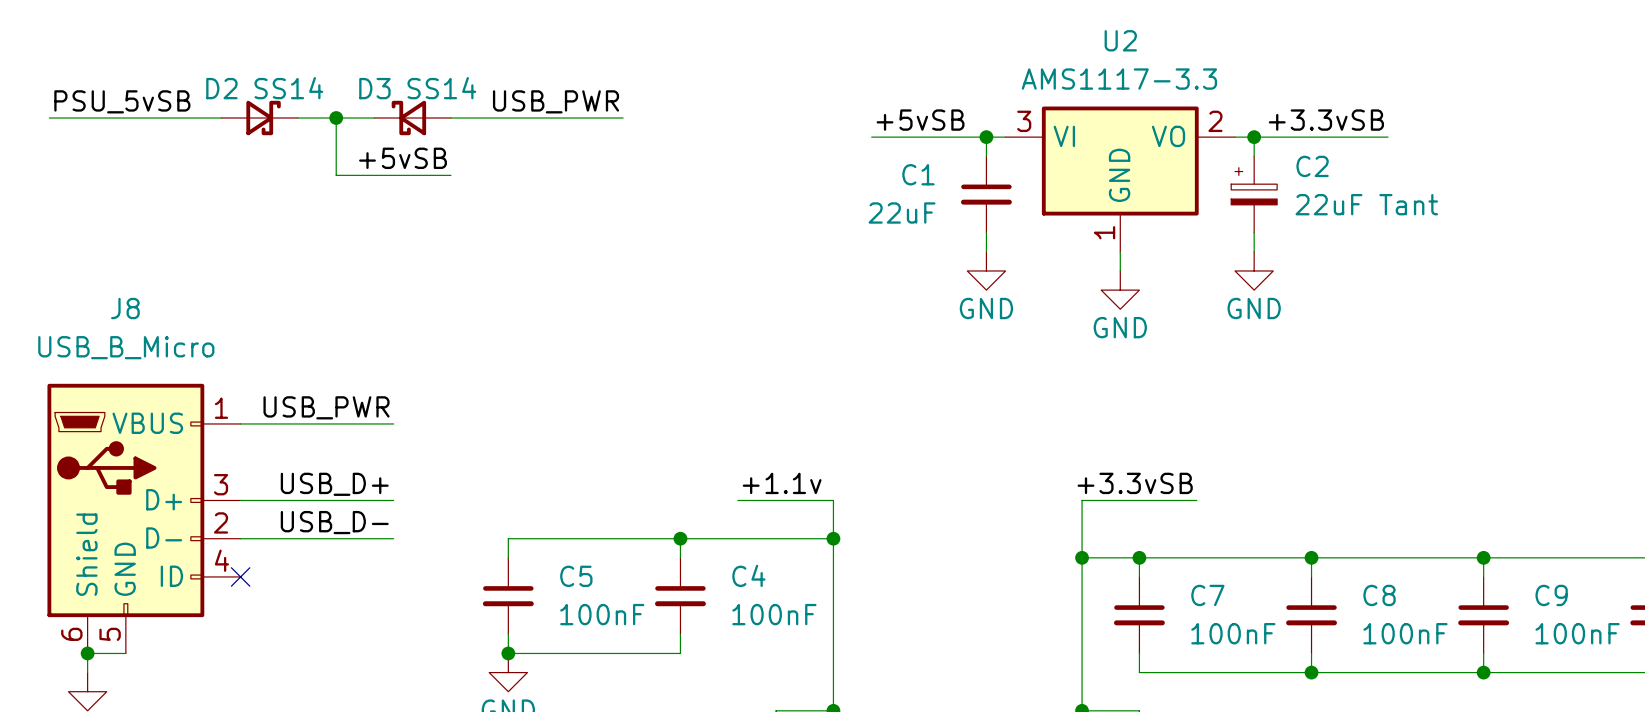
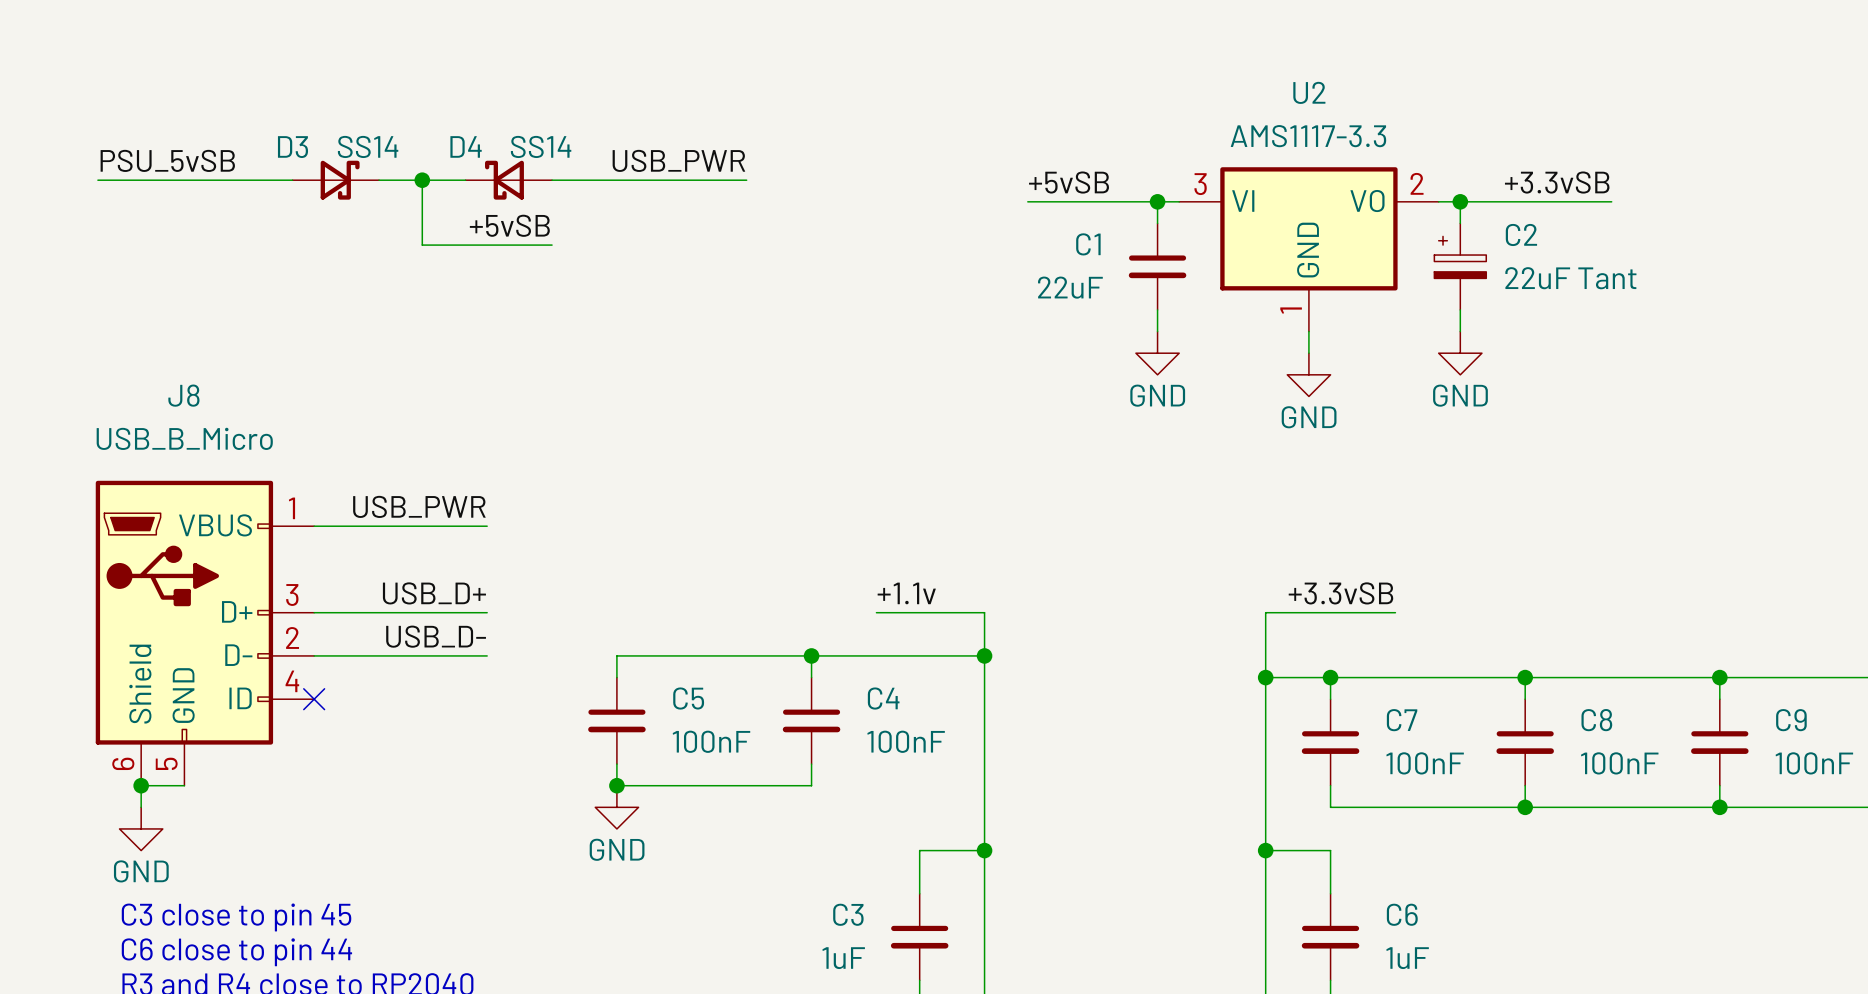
D2 name: D2 (221, 88) -> D3 (292, 147)
D3 name: D3 (374, 88) -> D4 (466, 146)

